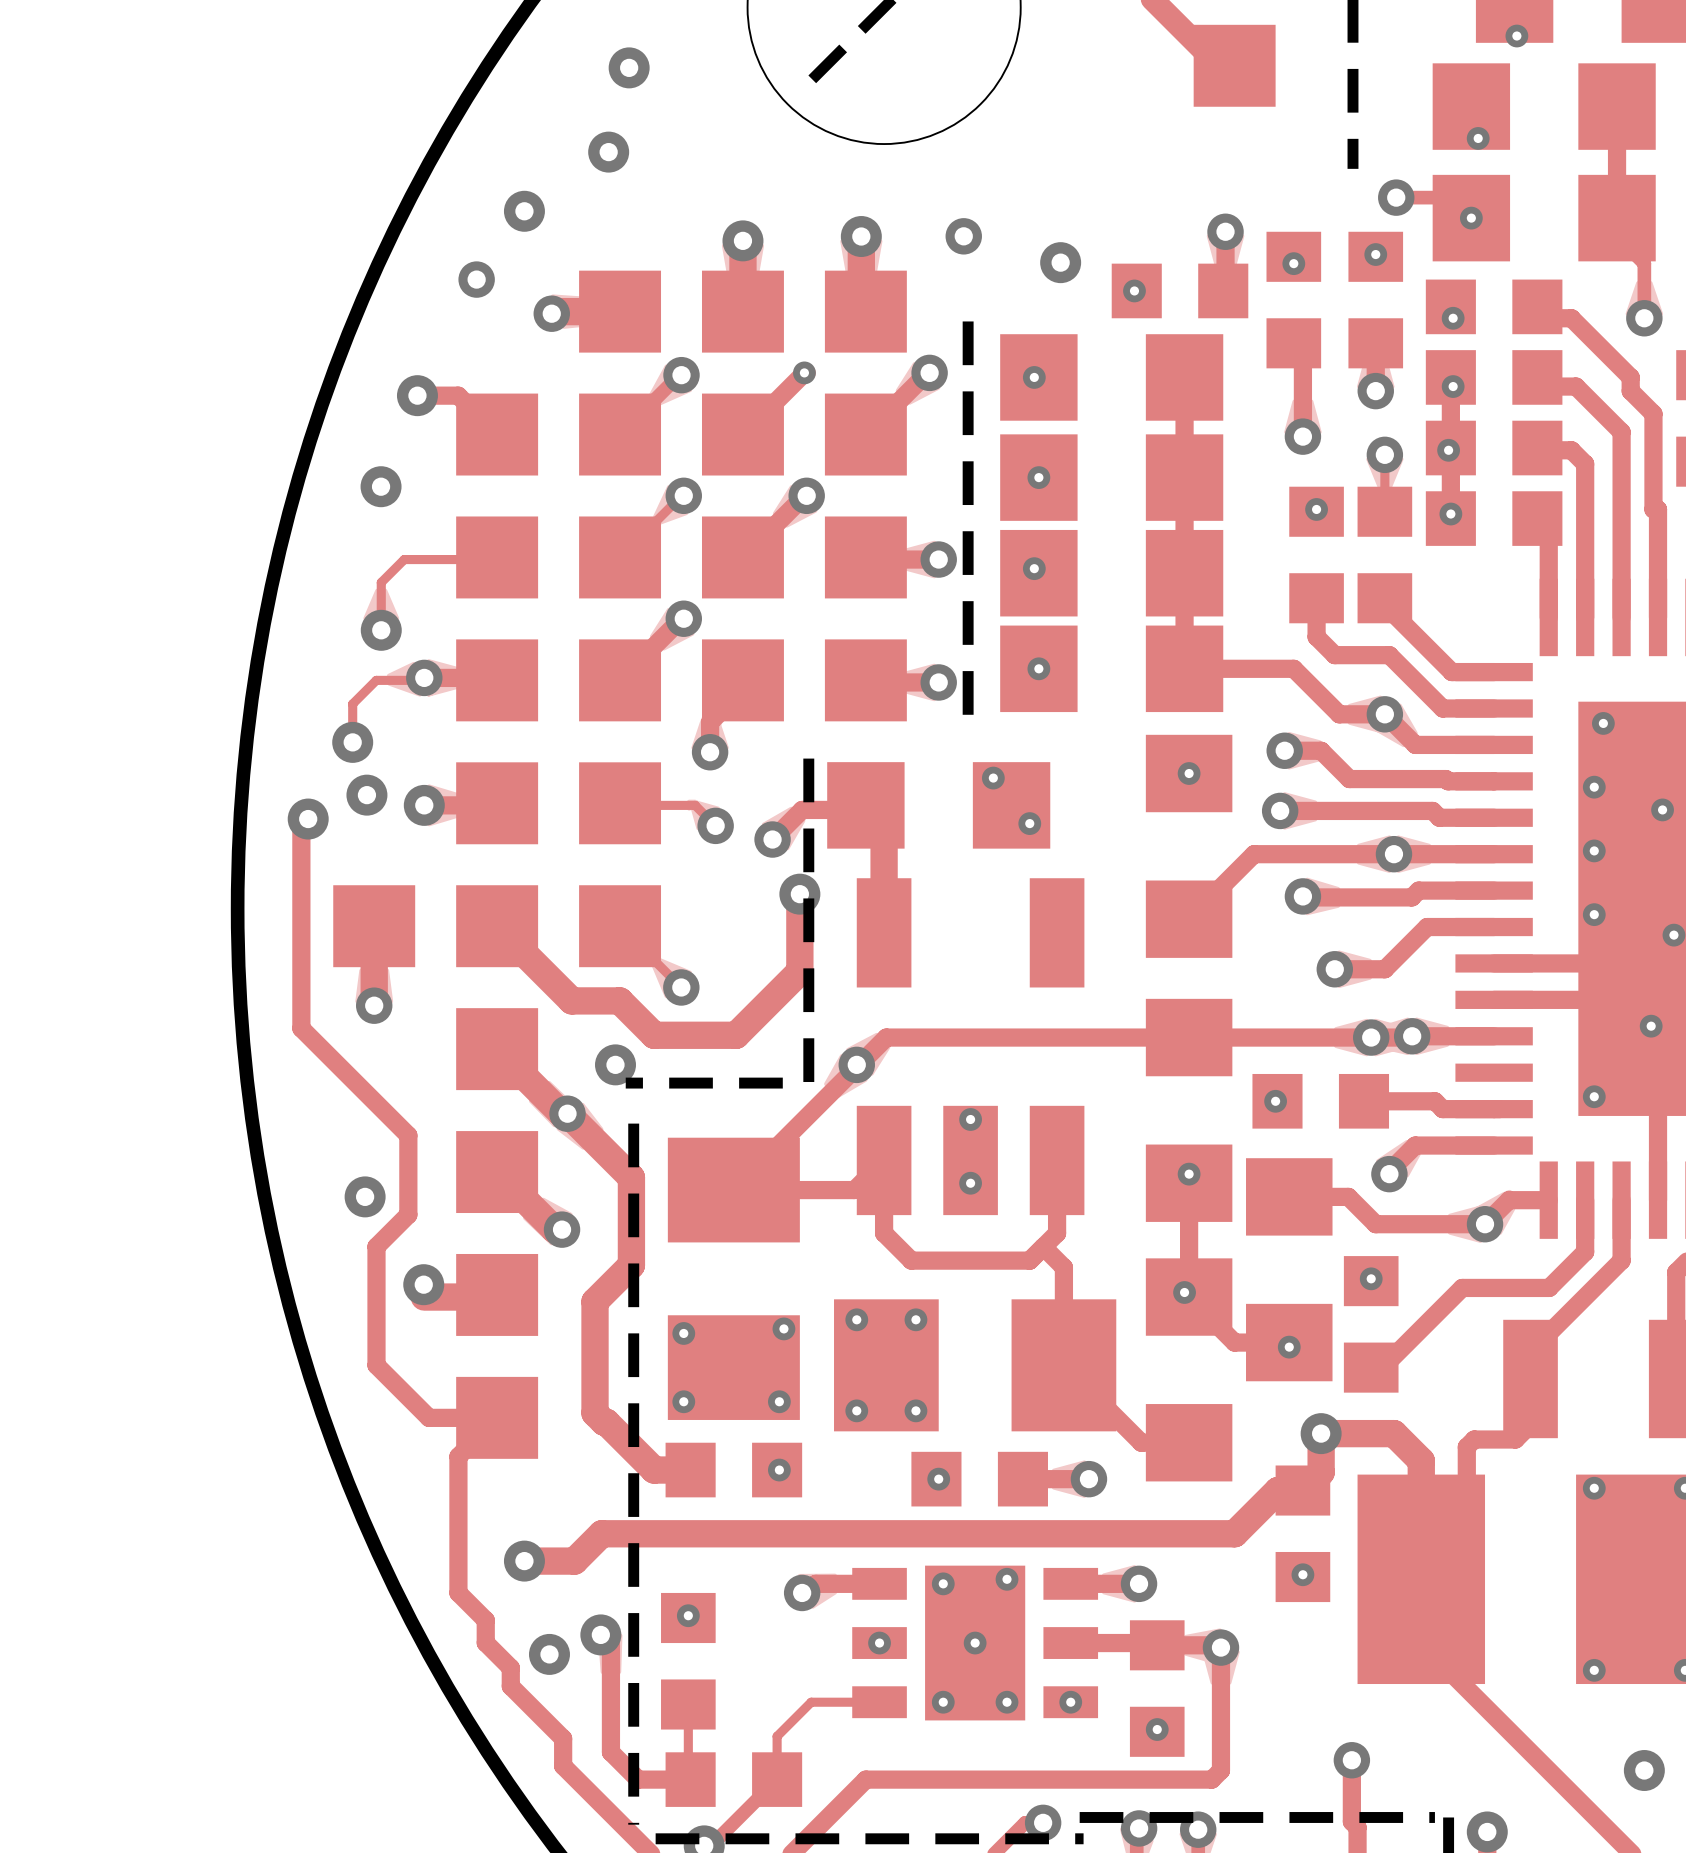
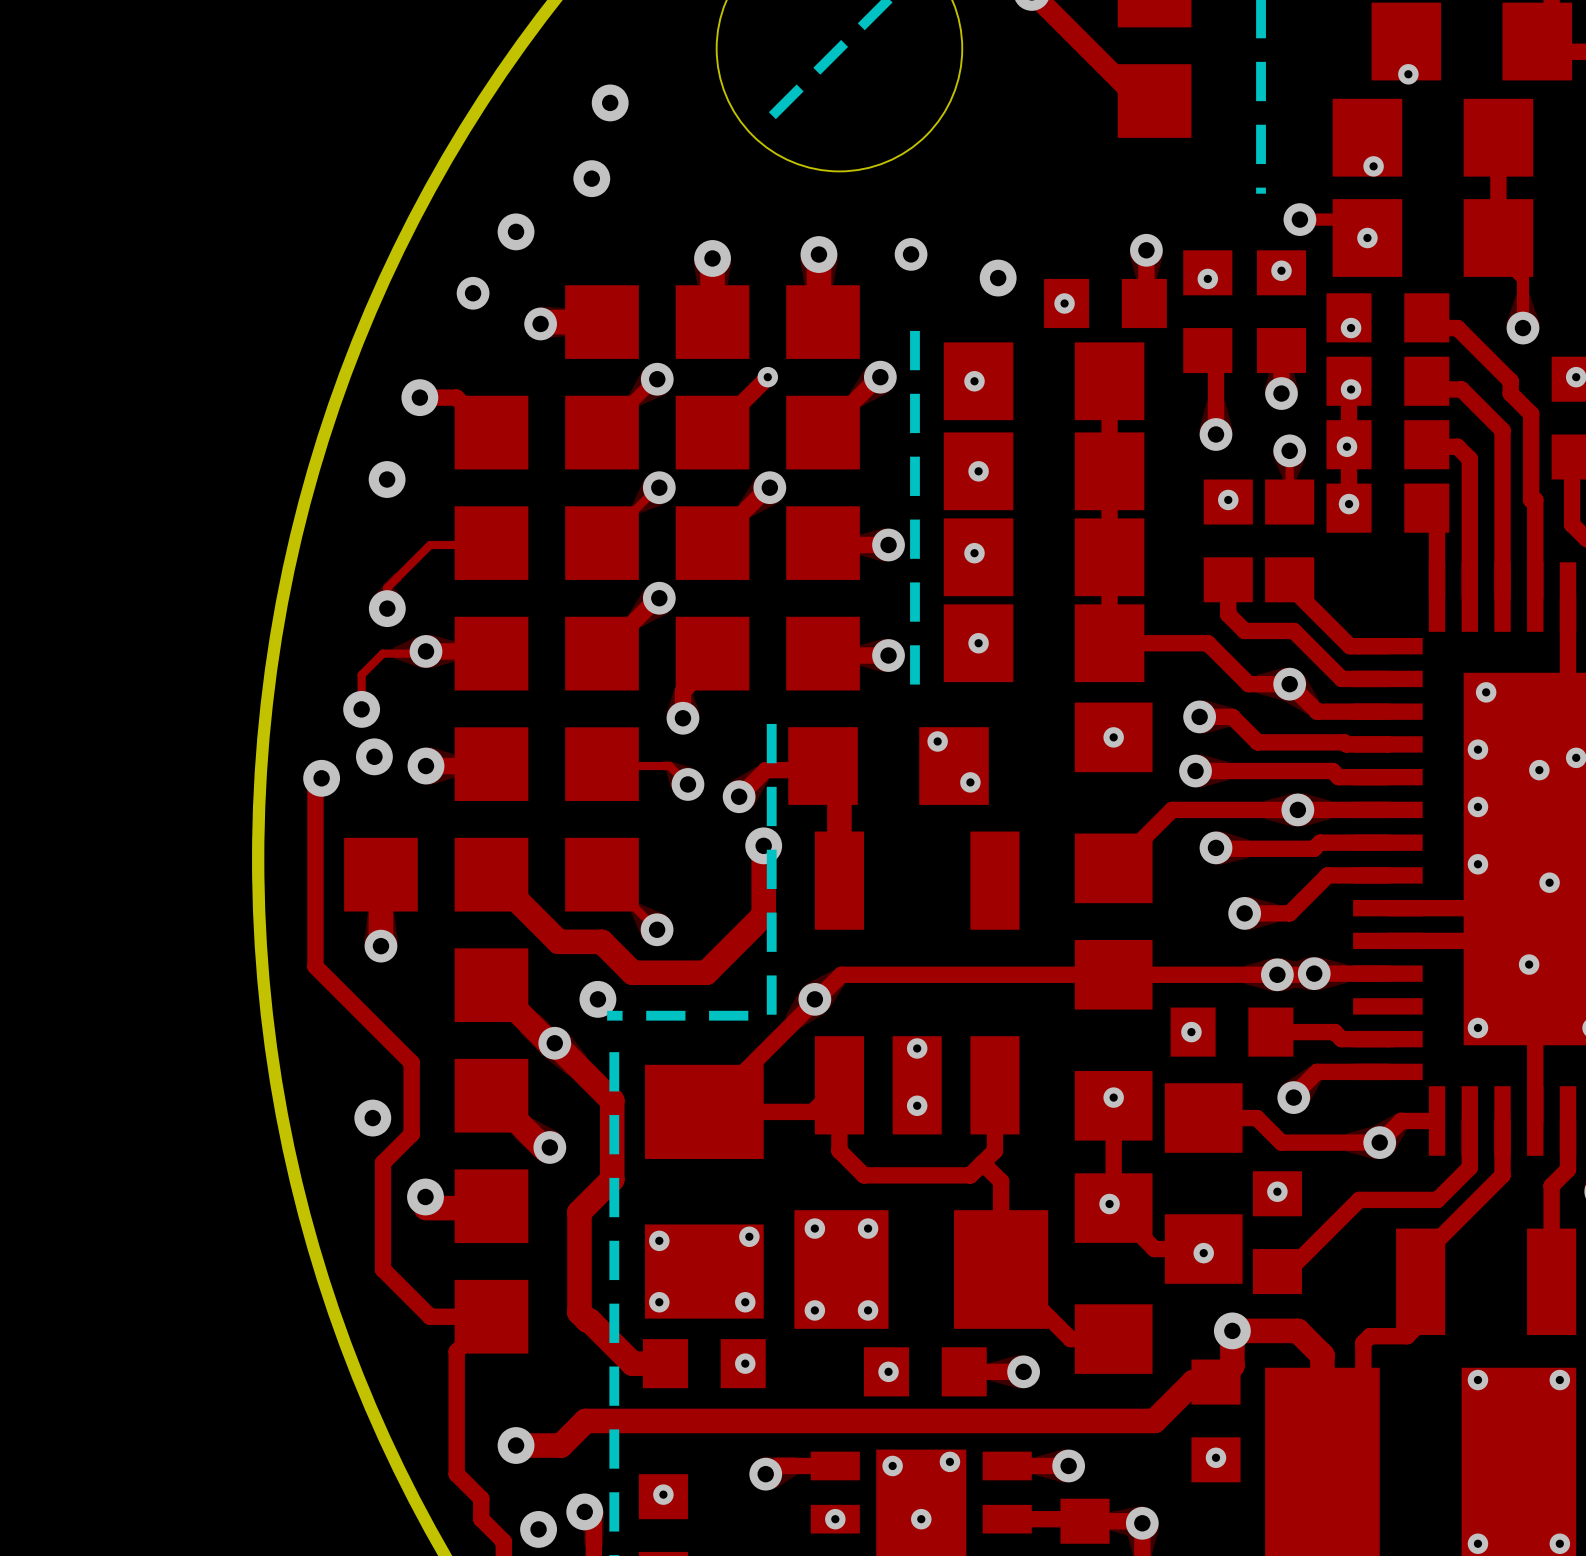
track: (428, 559) (404, 559) (381, 582) (381, 607) -> (430, 545) (387, 587)

